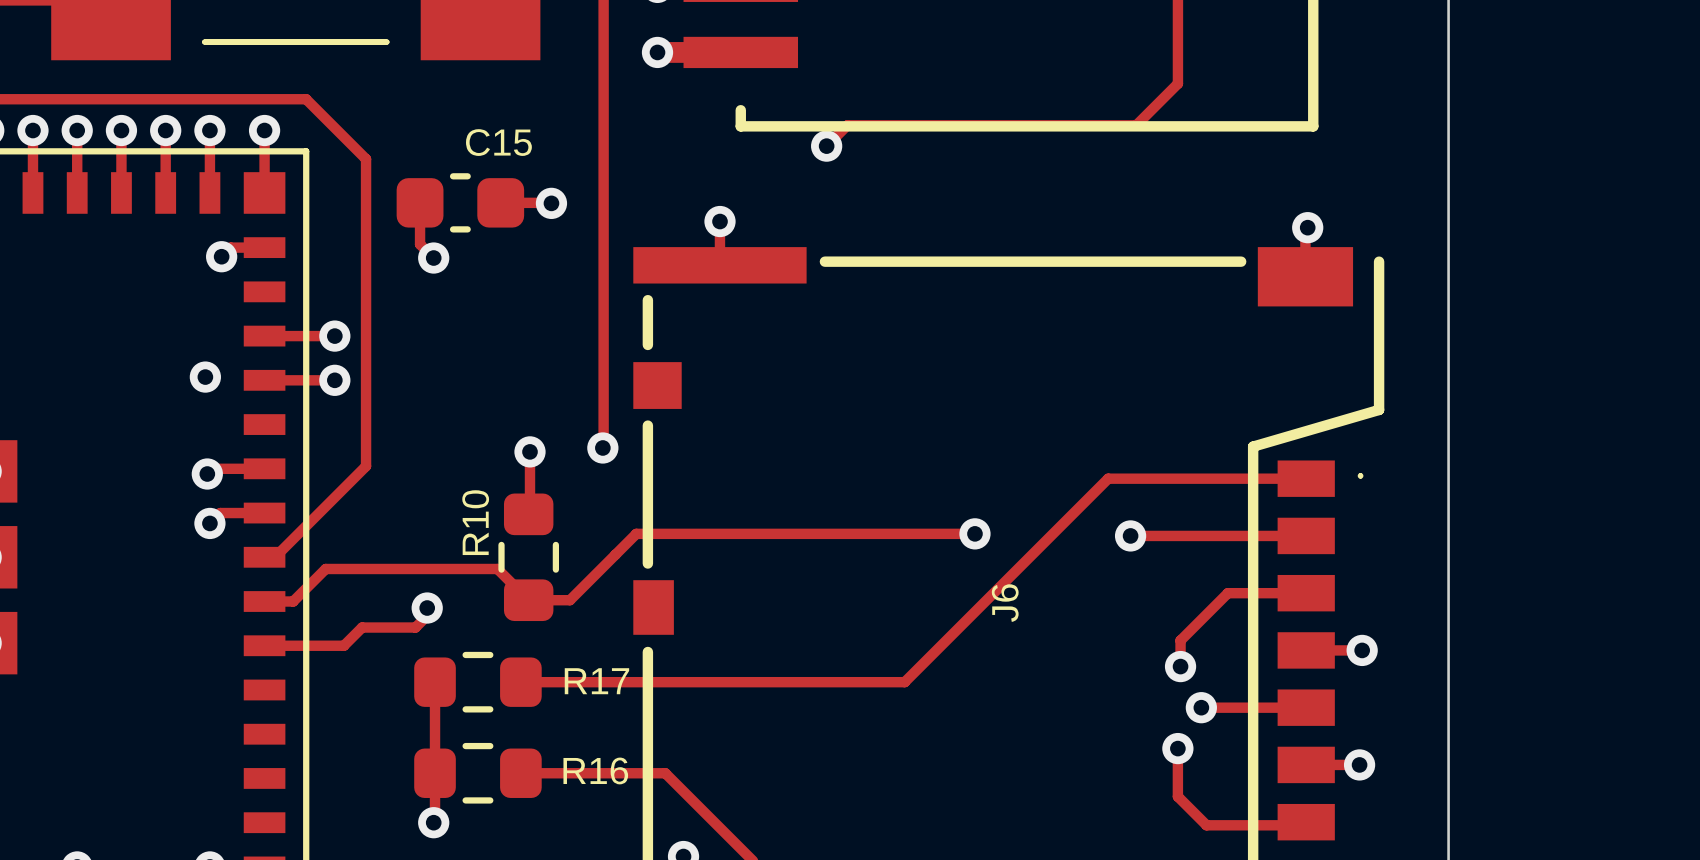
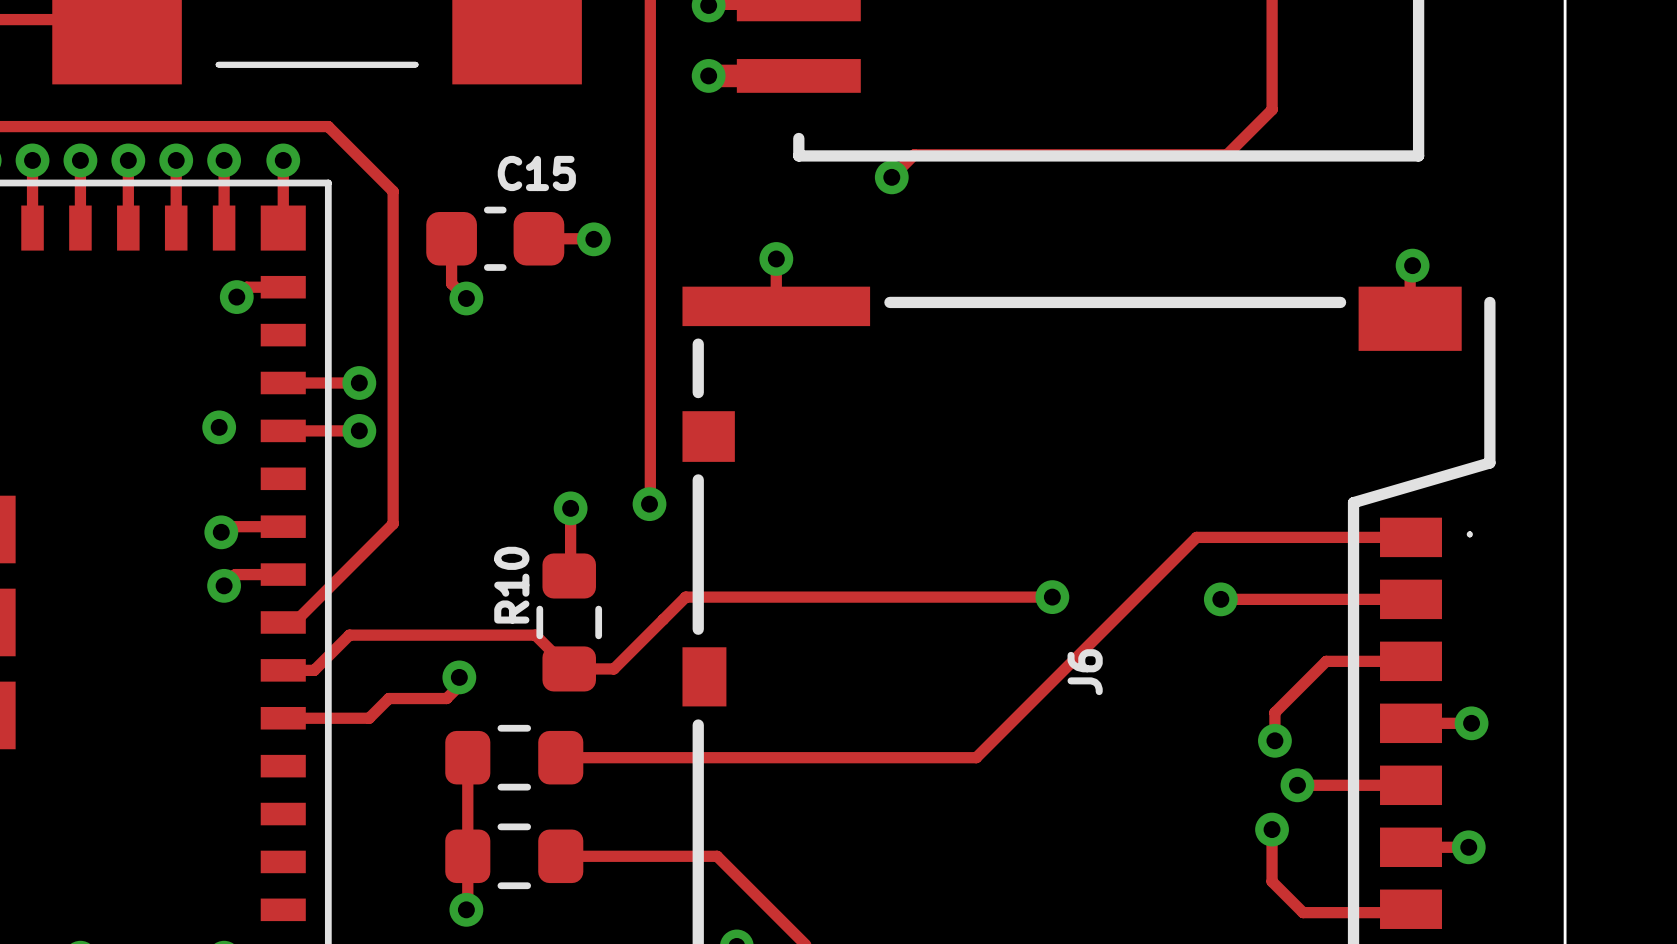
R17 name: R17 (596, 681) -> none
R16 name: R16 (595, 770) -> none

